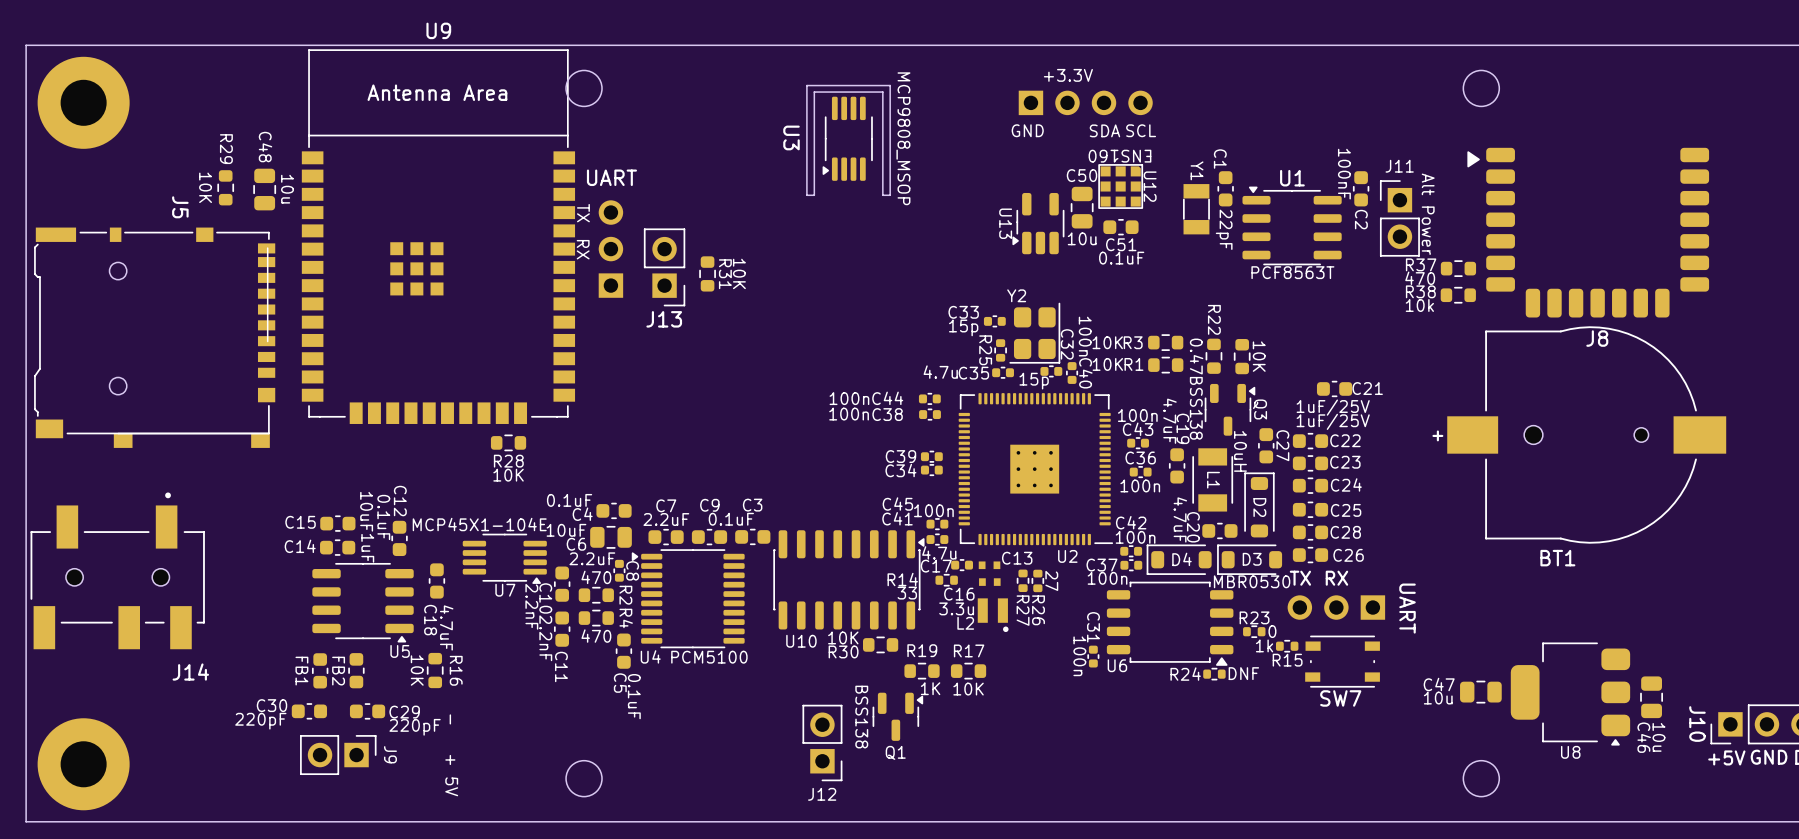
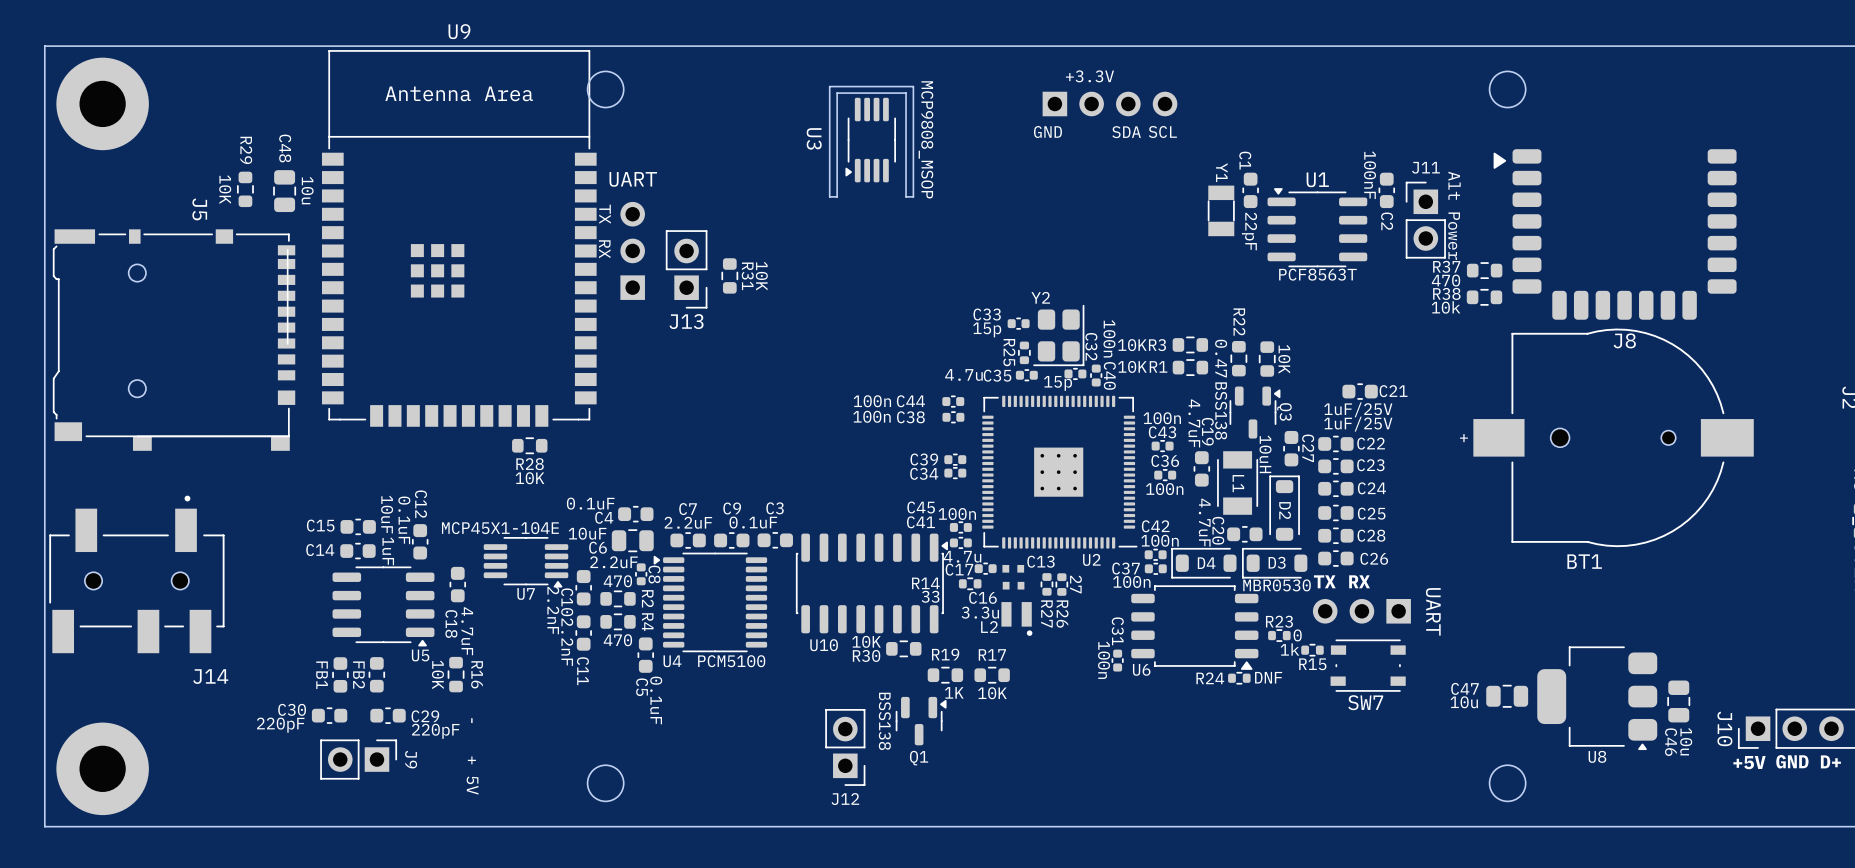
U12: ENS160 (1120, 186) -> none
C50: 10u (1082, 207) -> none
U13: (1038, 223) -> none
C51: 0.1uF (1120, 227) -> none

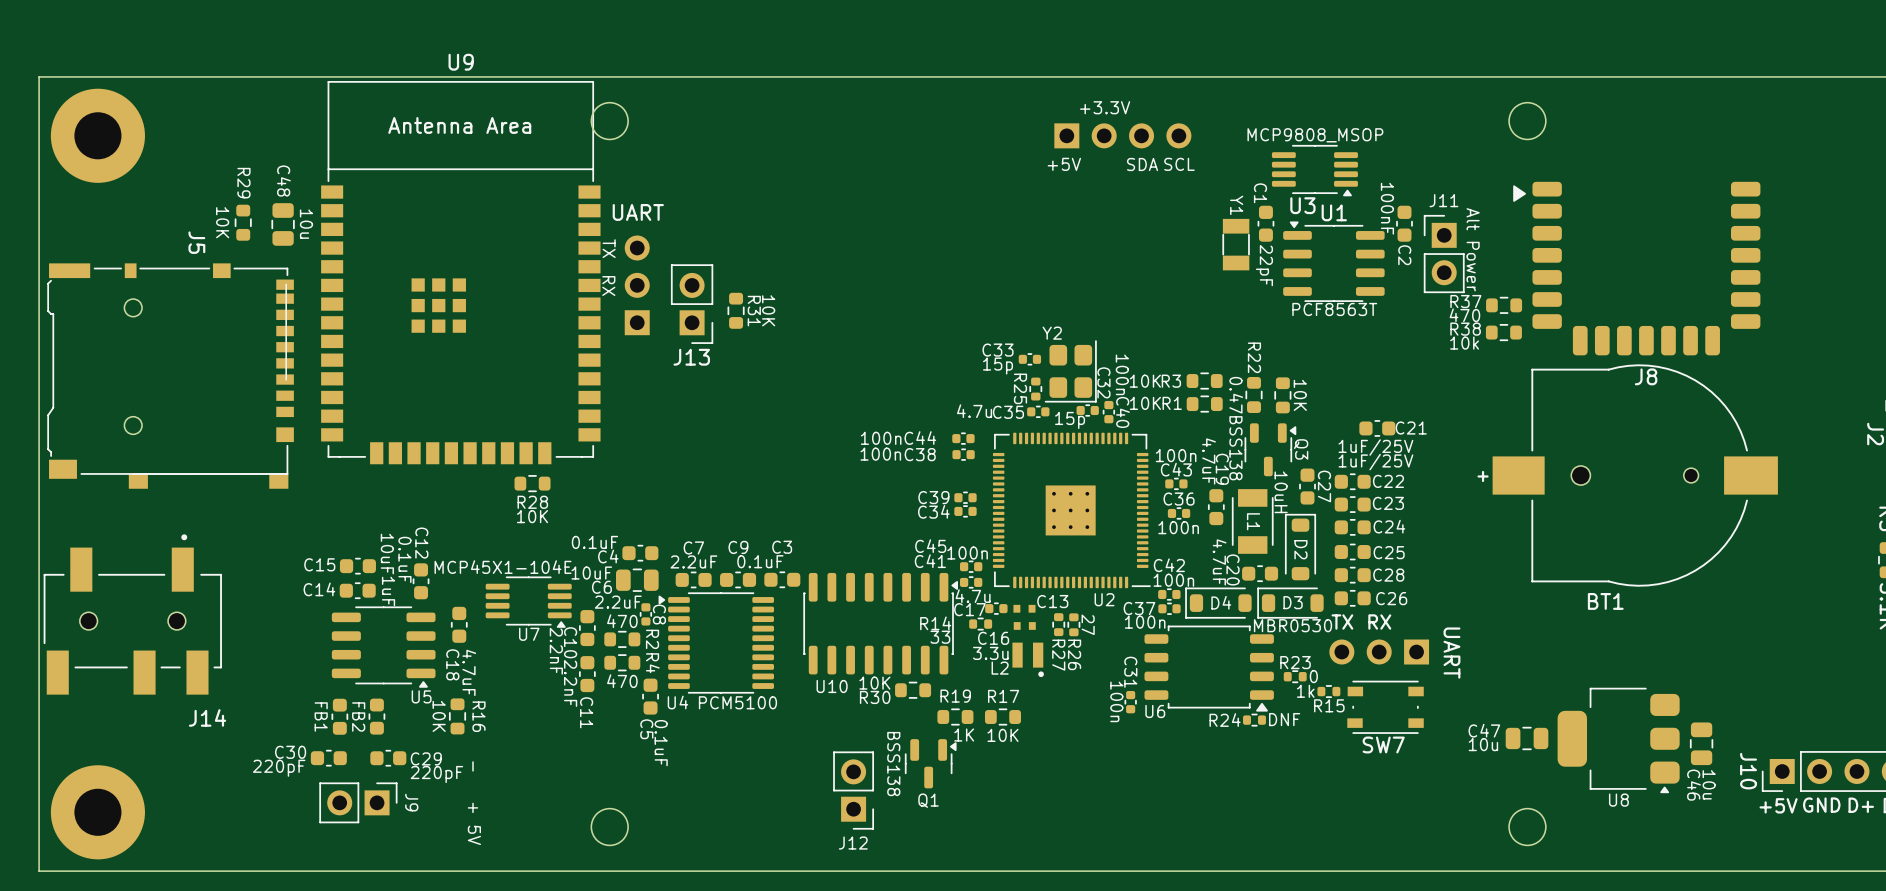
text: GND (1047, 132) -> +5V (1064, 164)
U3 rotation: 0° (870, 140) -> 90° counterclockwise (1314, 170)
U3 position: (870, 140) -> (1314, 170)
board edge: (829, 196) (837, 196) (837, 93) (906, 93) (906, 196) (913, 196) (913, 86) (829, 86) (829, 196) -> none

